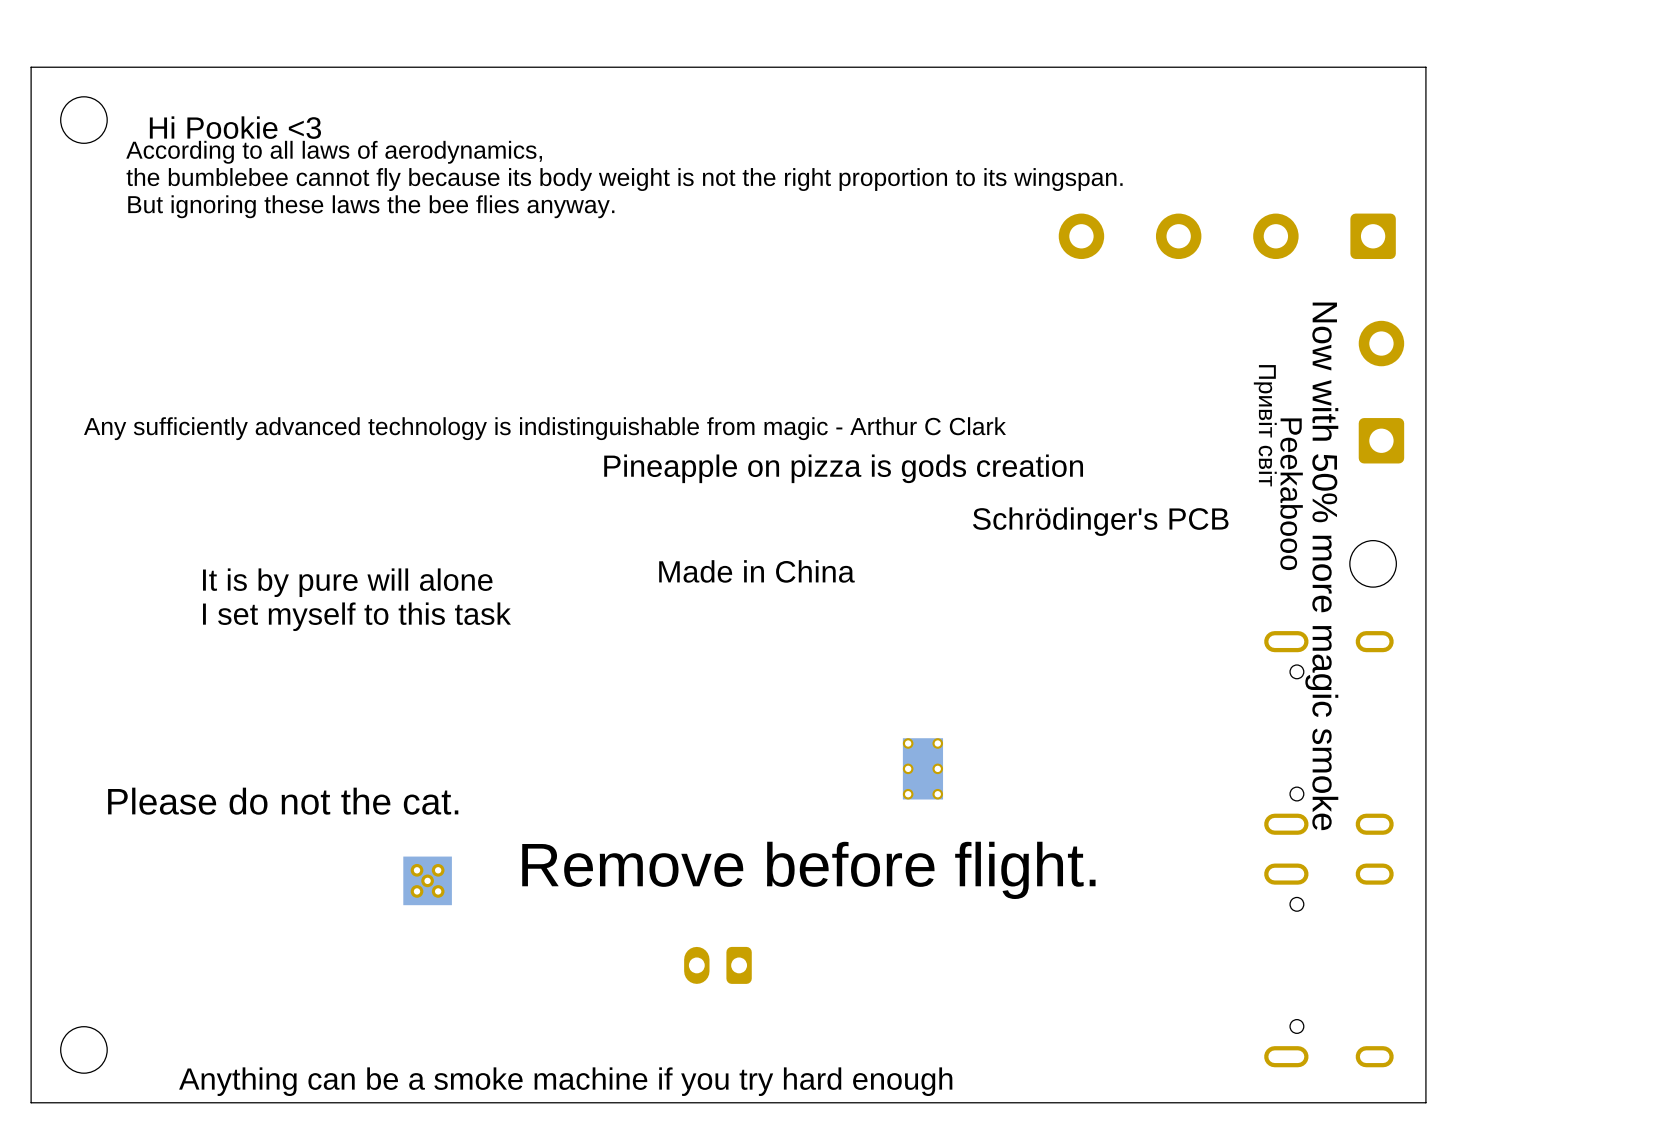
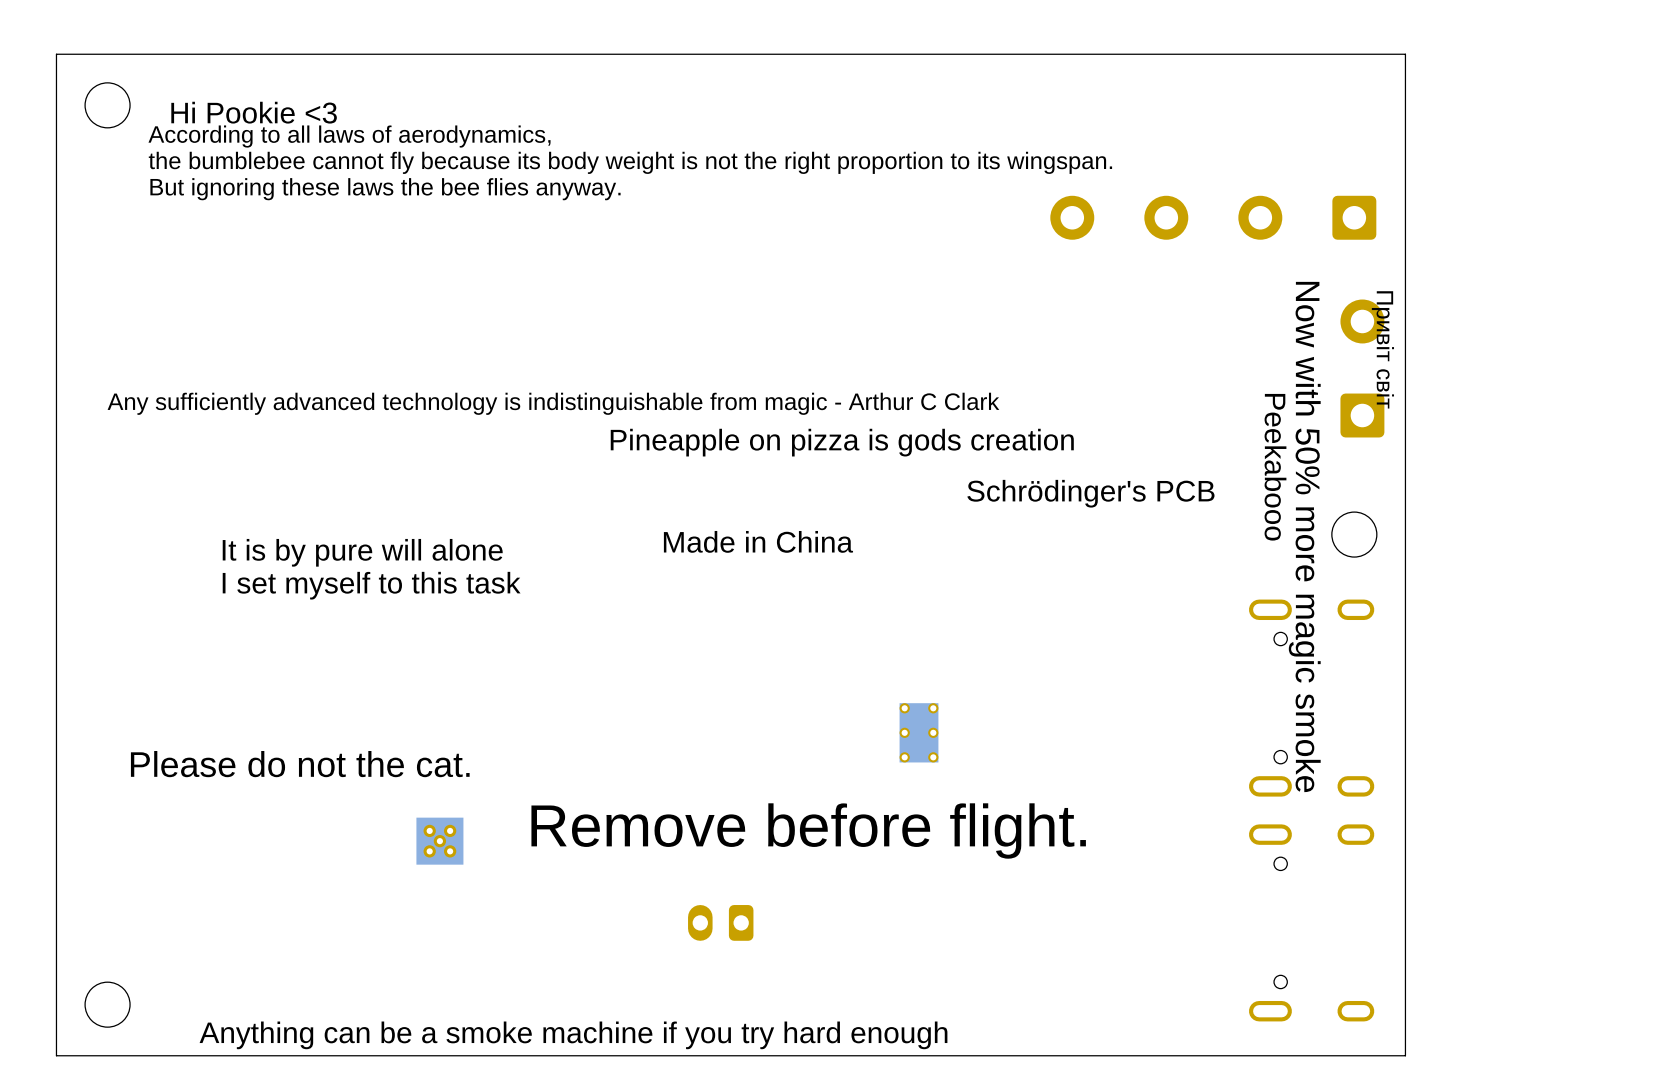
text position: Привіт світ (1265, 425) -> Привіт світ (1382, 349)

